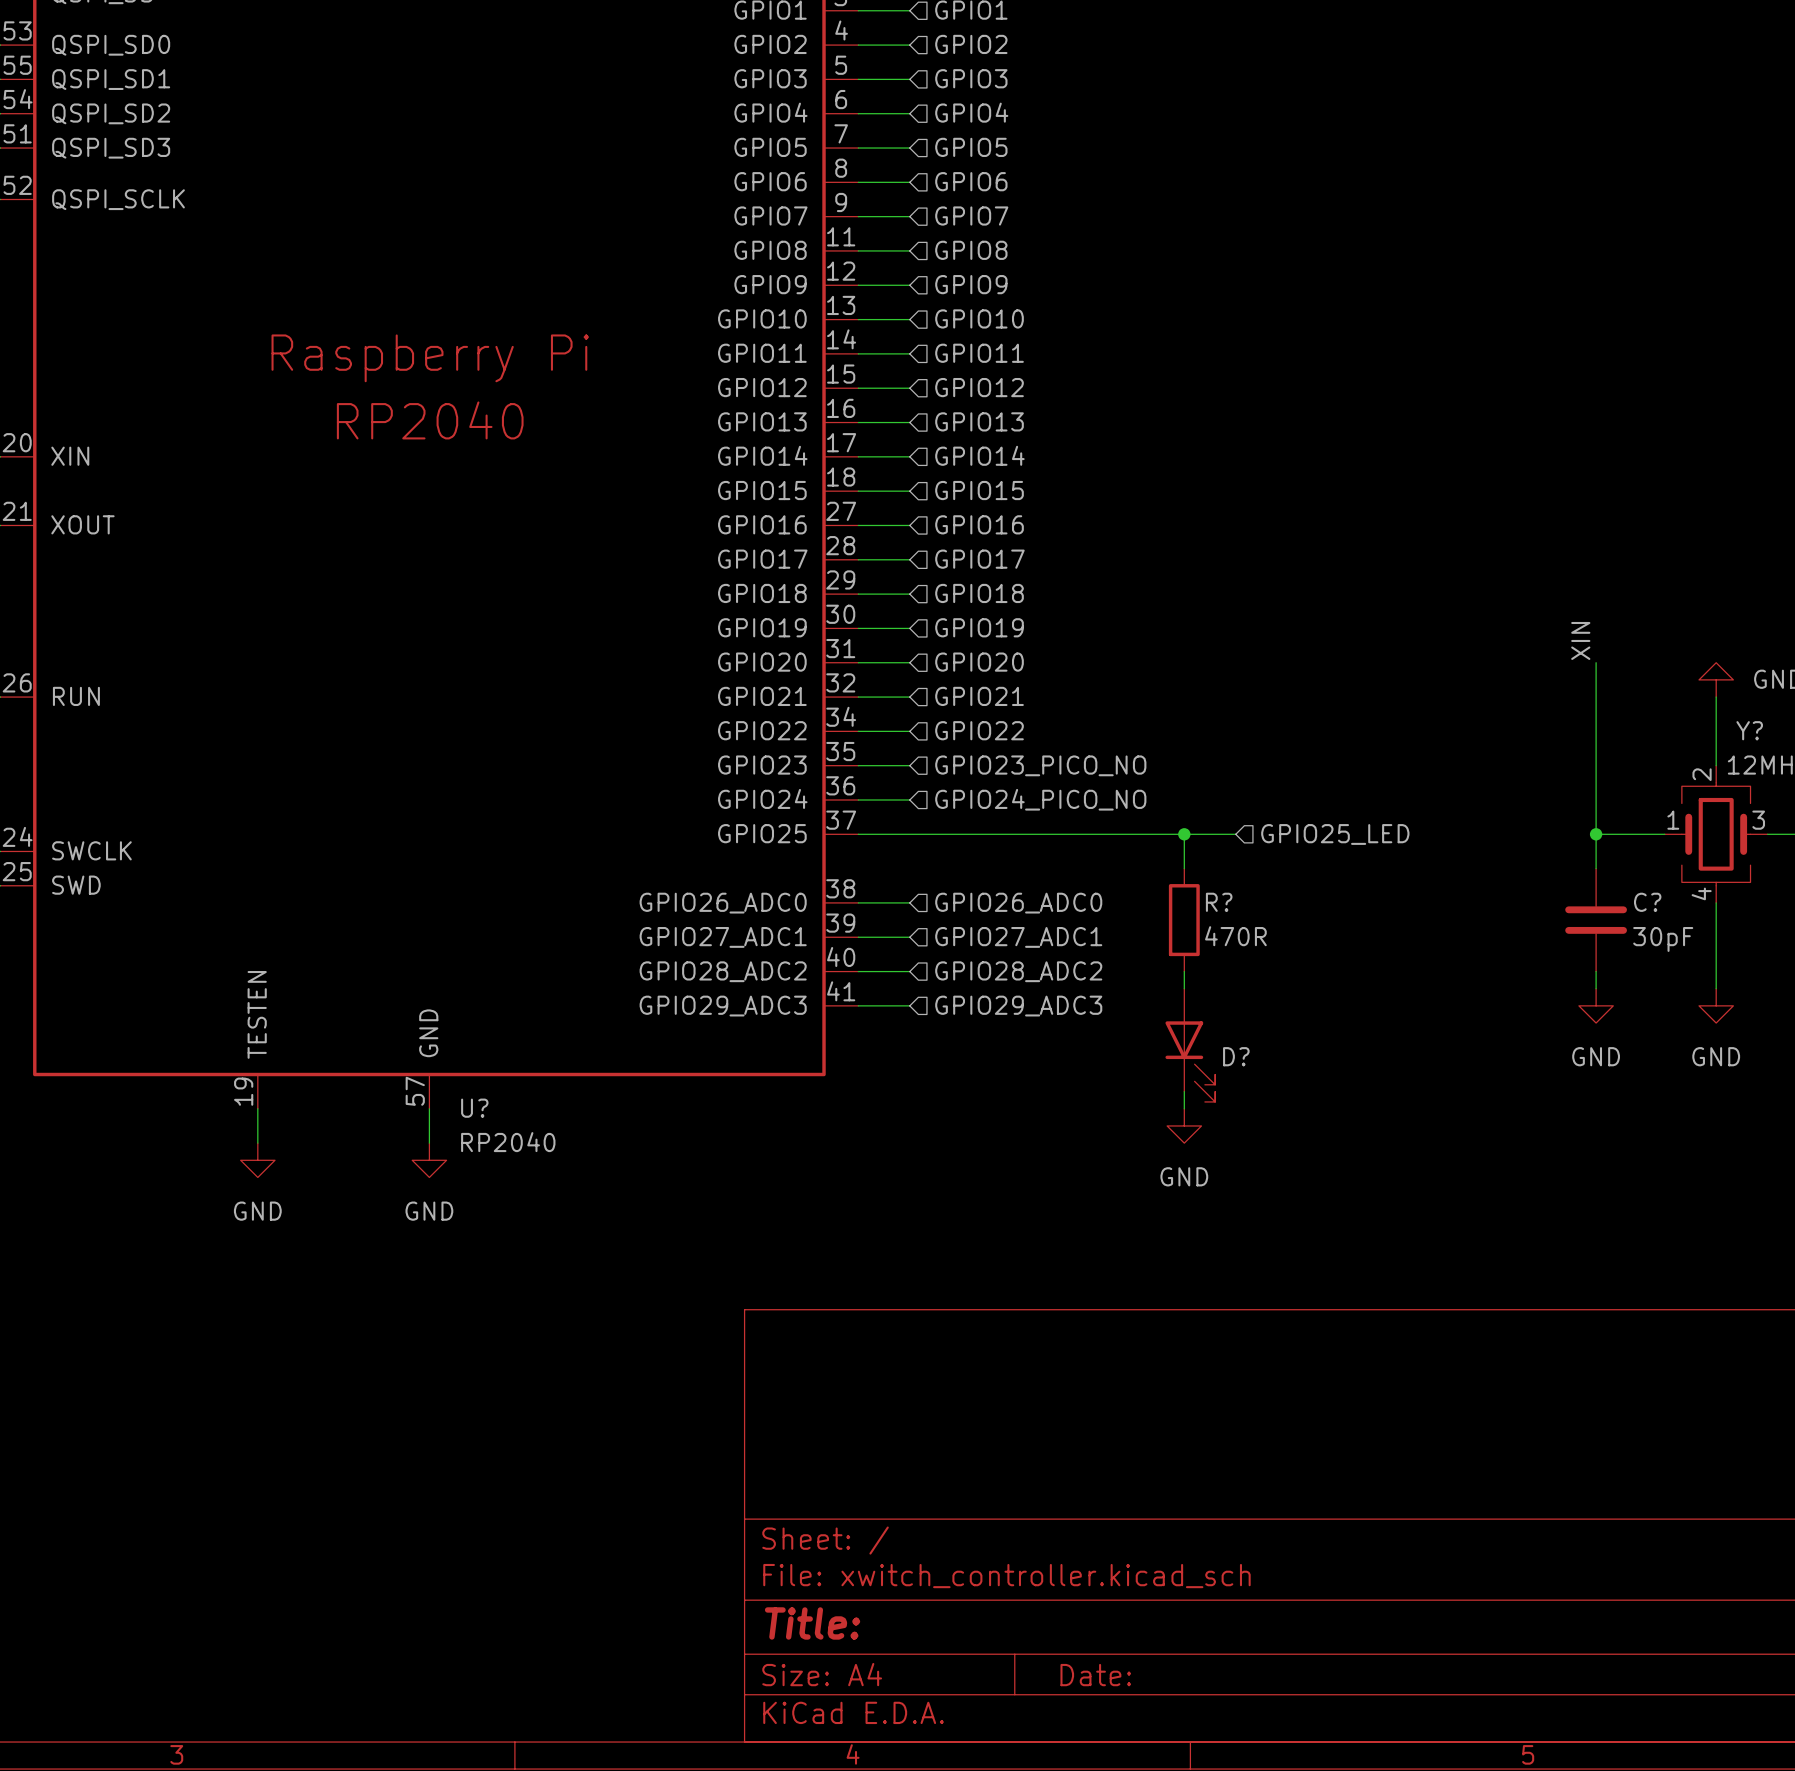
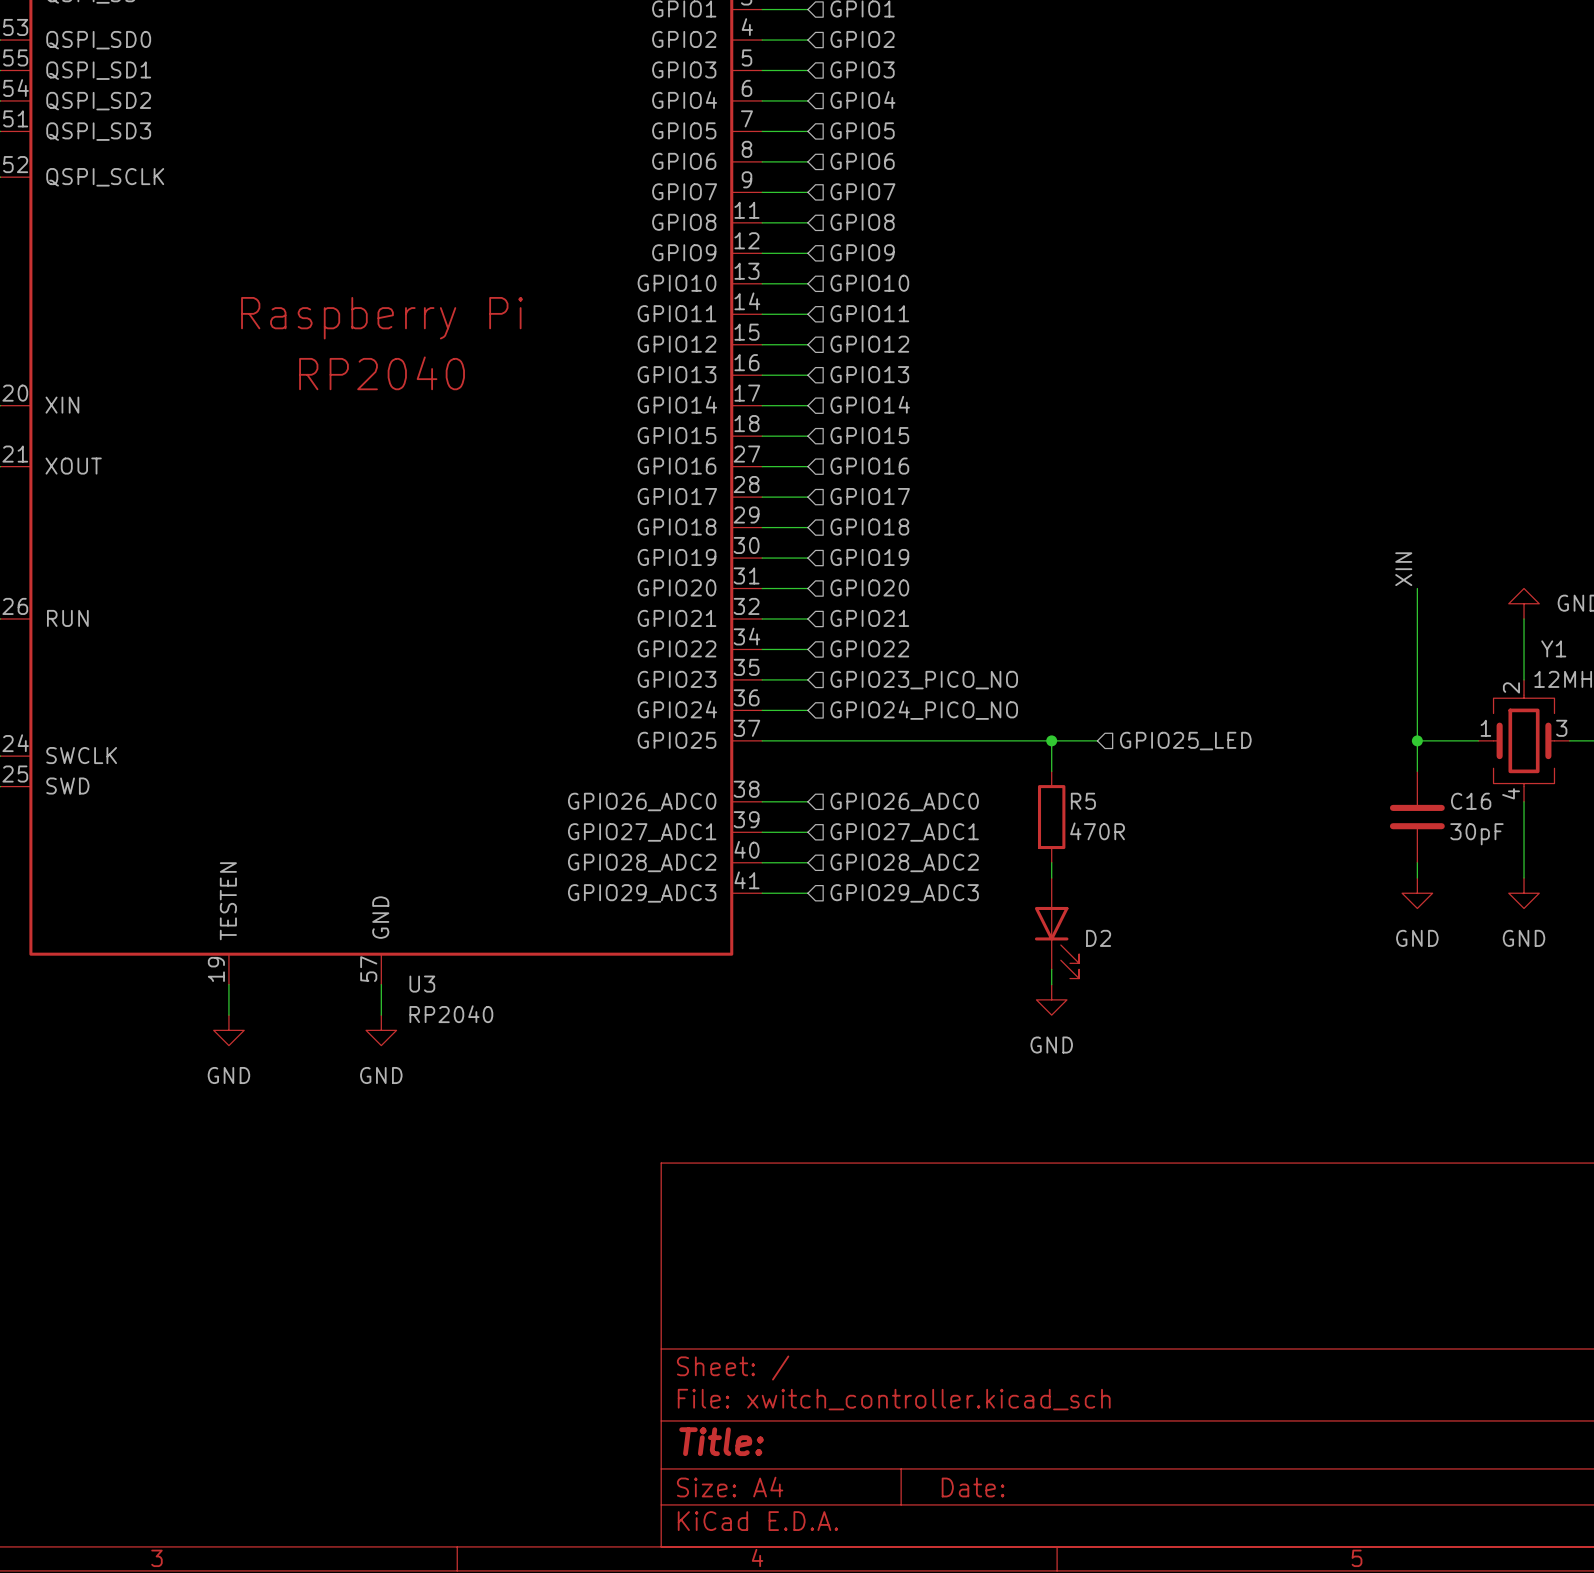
Y? name: Y? (1749, 730) -> Y1 (1553, 648)
R? name: R? (1219, 902) -> R5 (1083, 801)
C? name: C? (1647, 902) -> C16 (1471, 801)
D? name: D? (1236, 1056) -> D2 (1098, 938)
U? name: U? (474, 1108) -> U3 (422, 984)

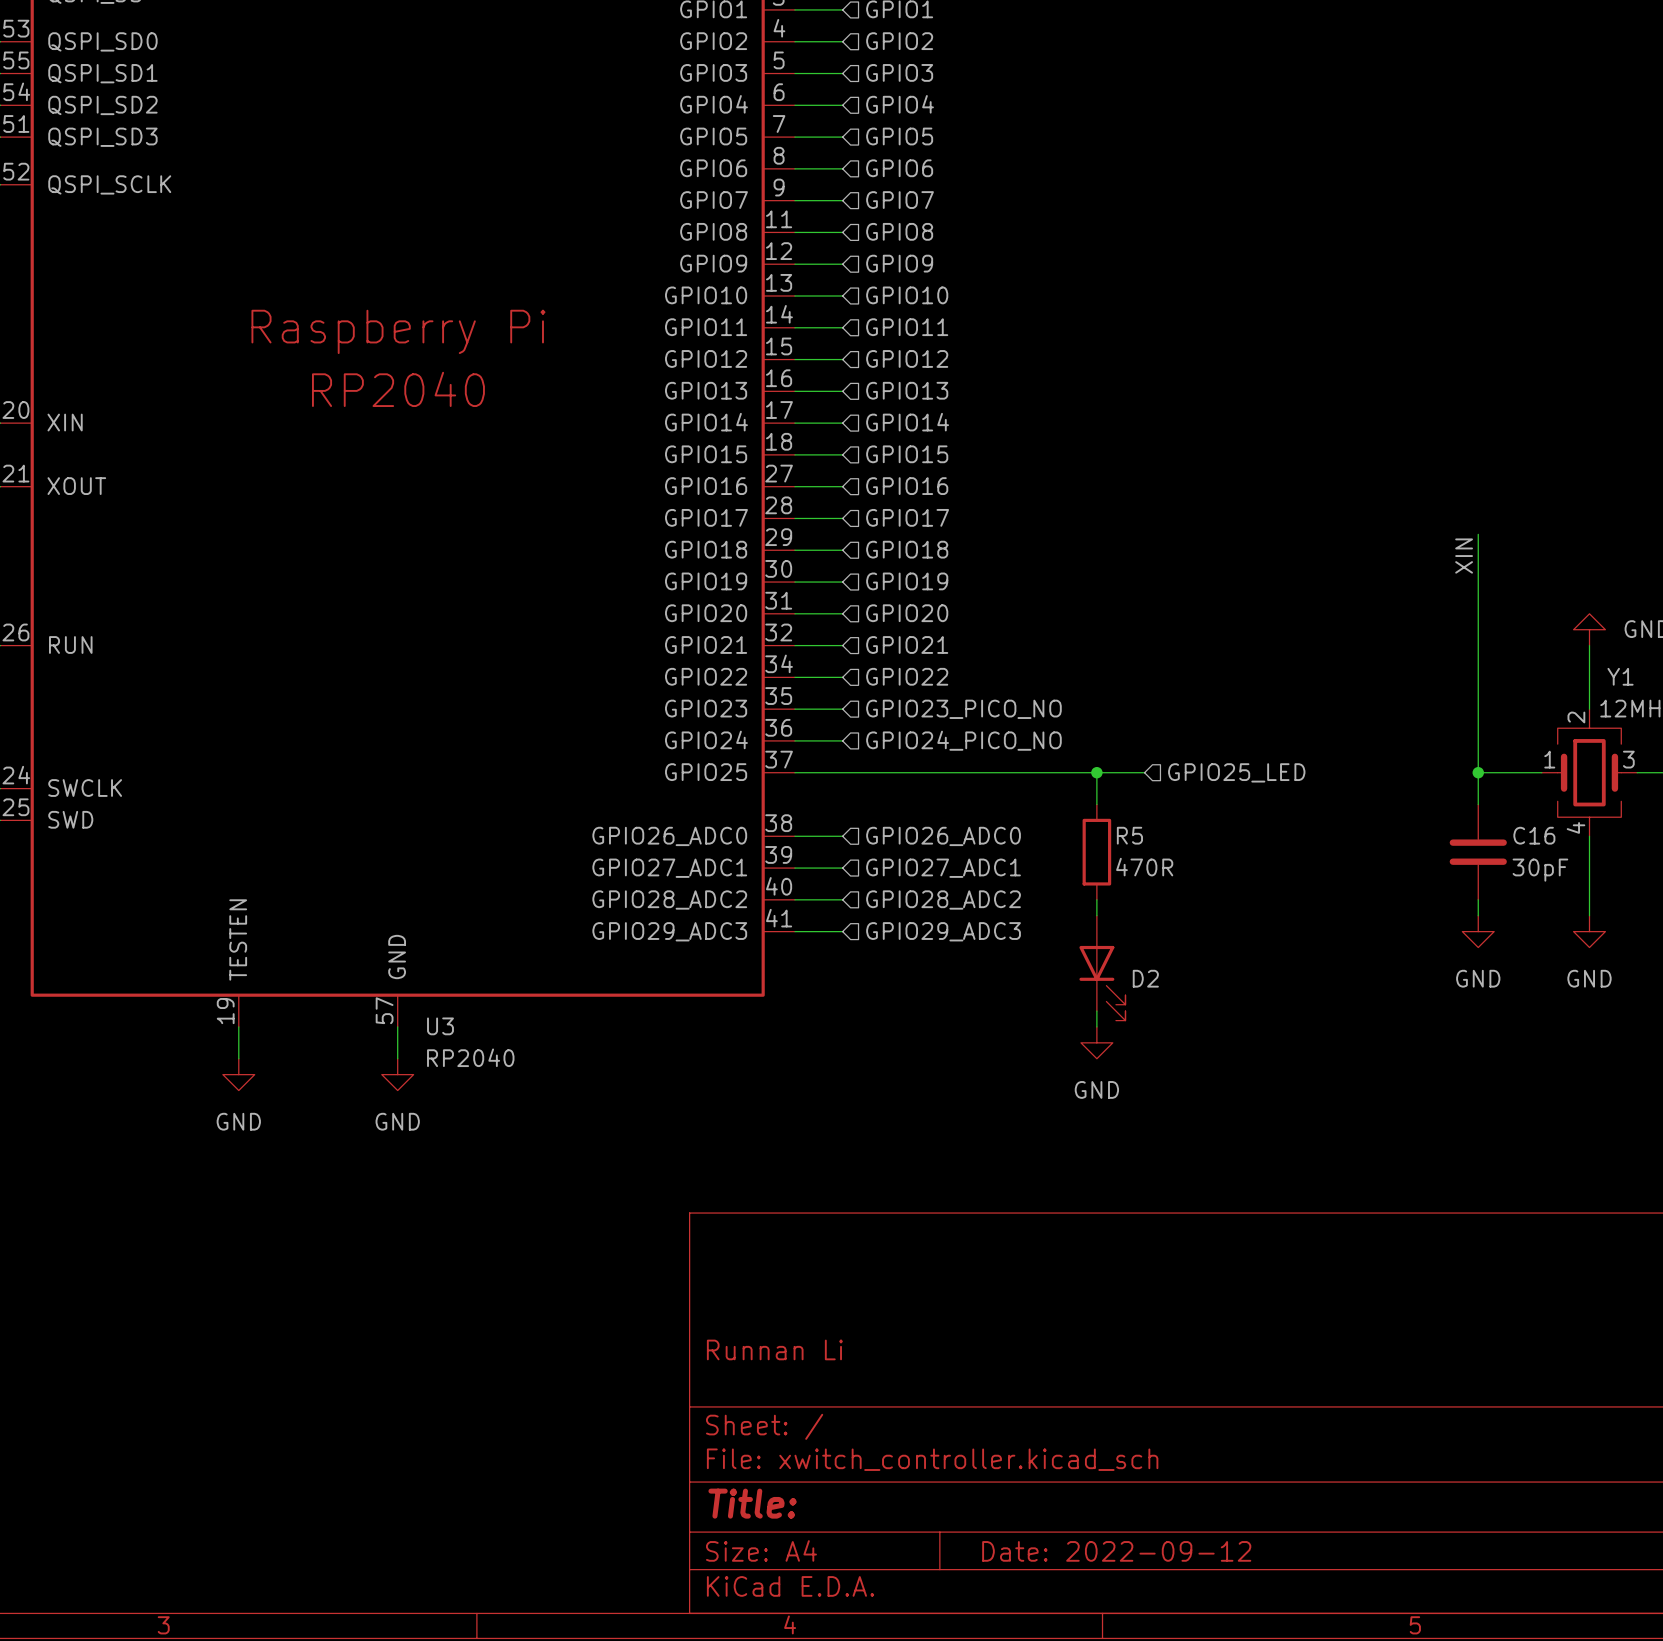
wire: none -> (1478, 534) (1478, 613)
label position: XIN (1403, 569) -> XIN (1464, 556)
title block: none -> Runnan Li (774, 1349)
title block: Date: (973, 1487) -> Date: 2022-09-12 (1116, 1551)

